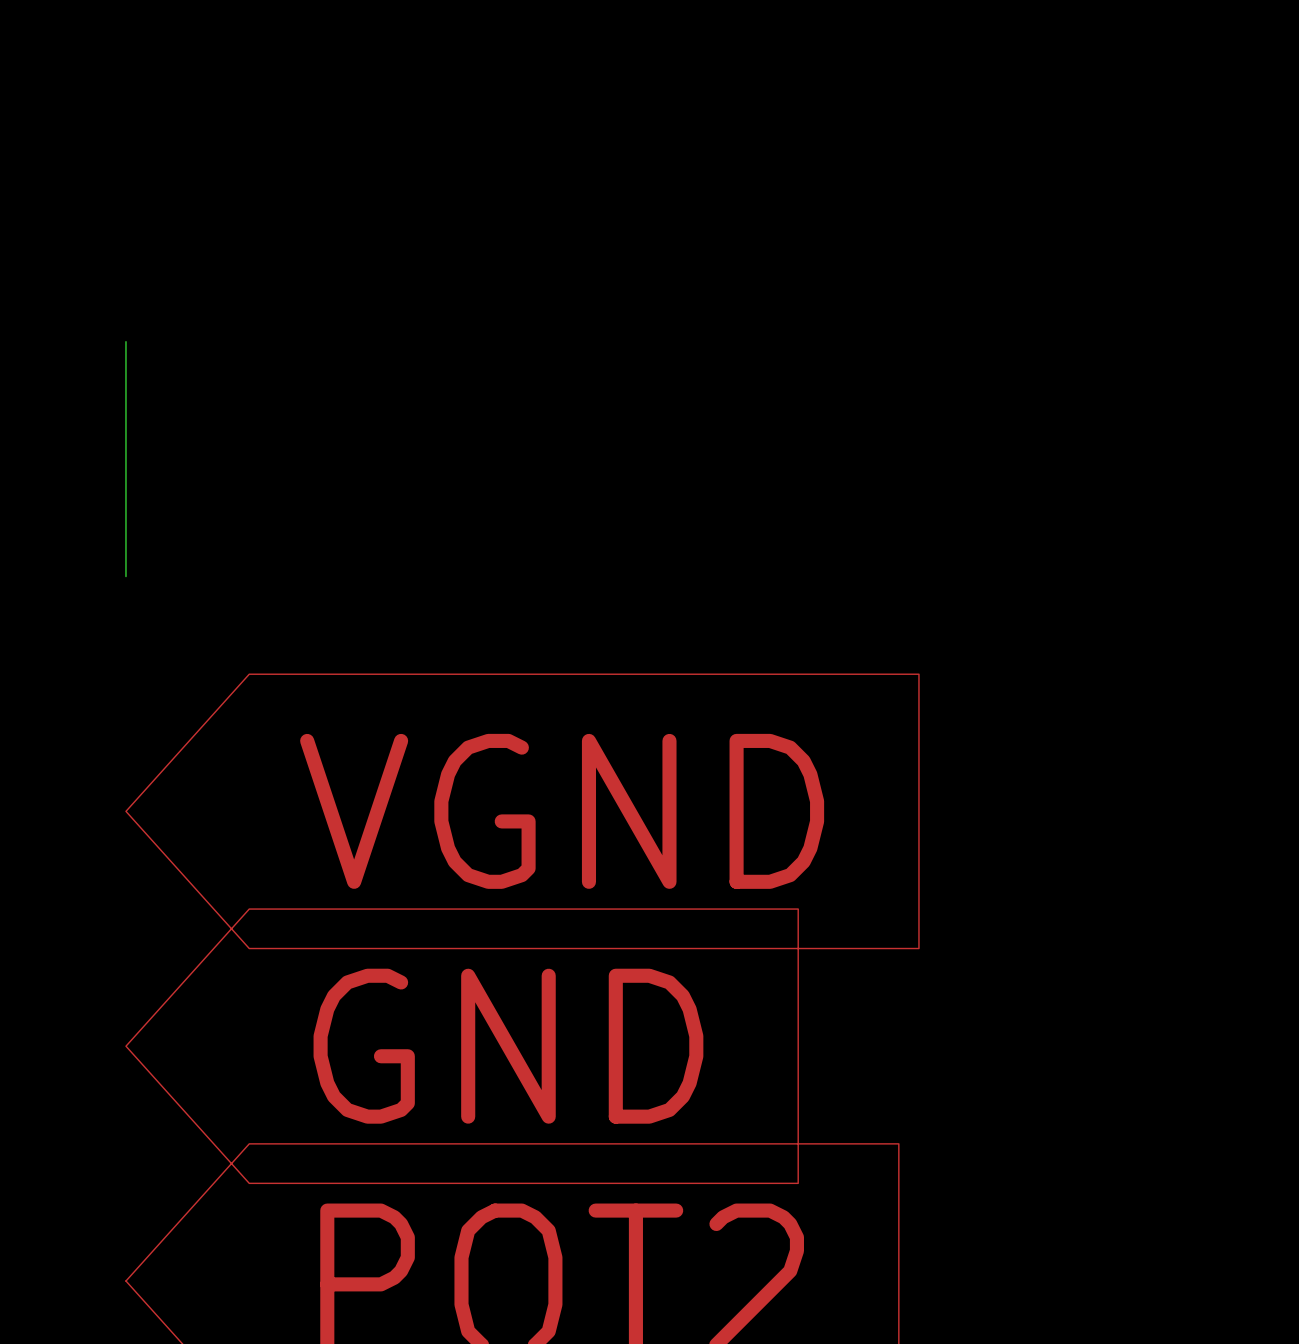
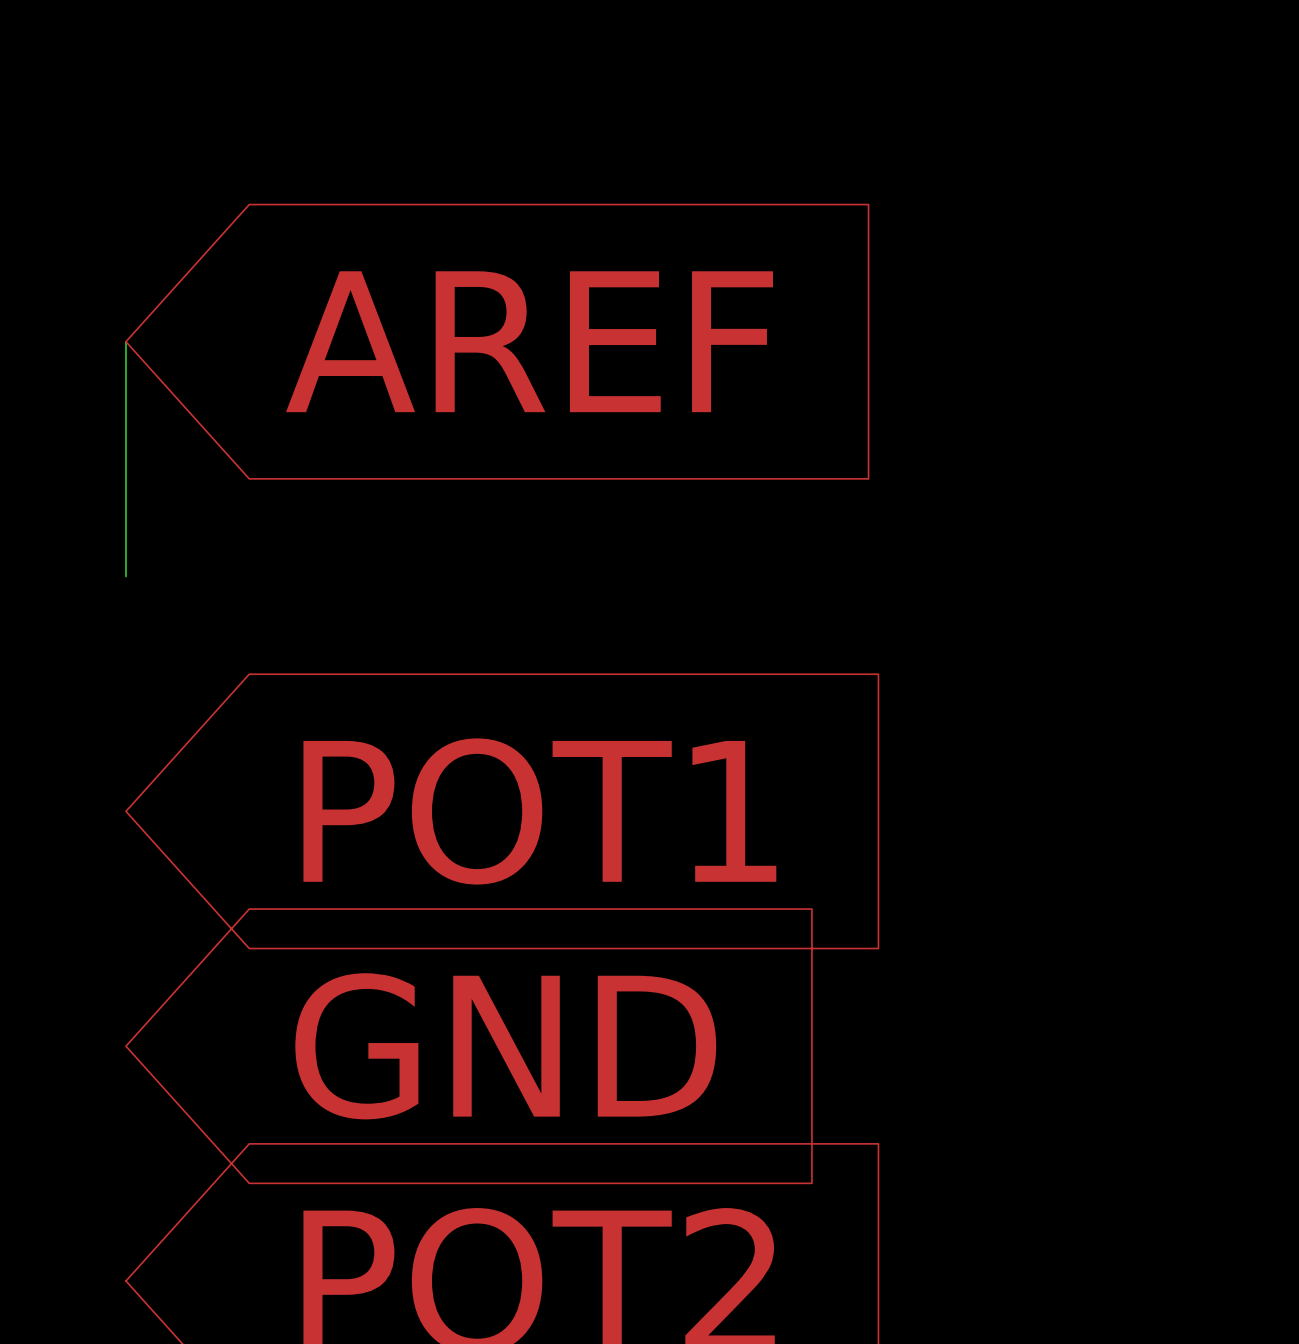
global label: none -> AREF (529, 341)
global label: VGND (562, 811) -> POT1 (539, 811)

